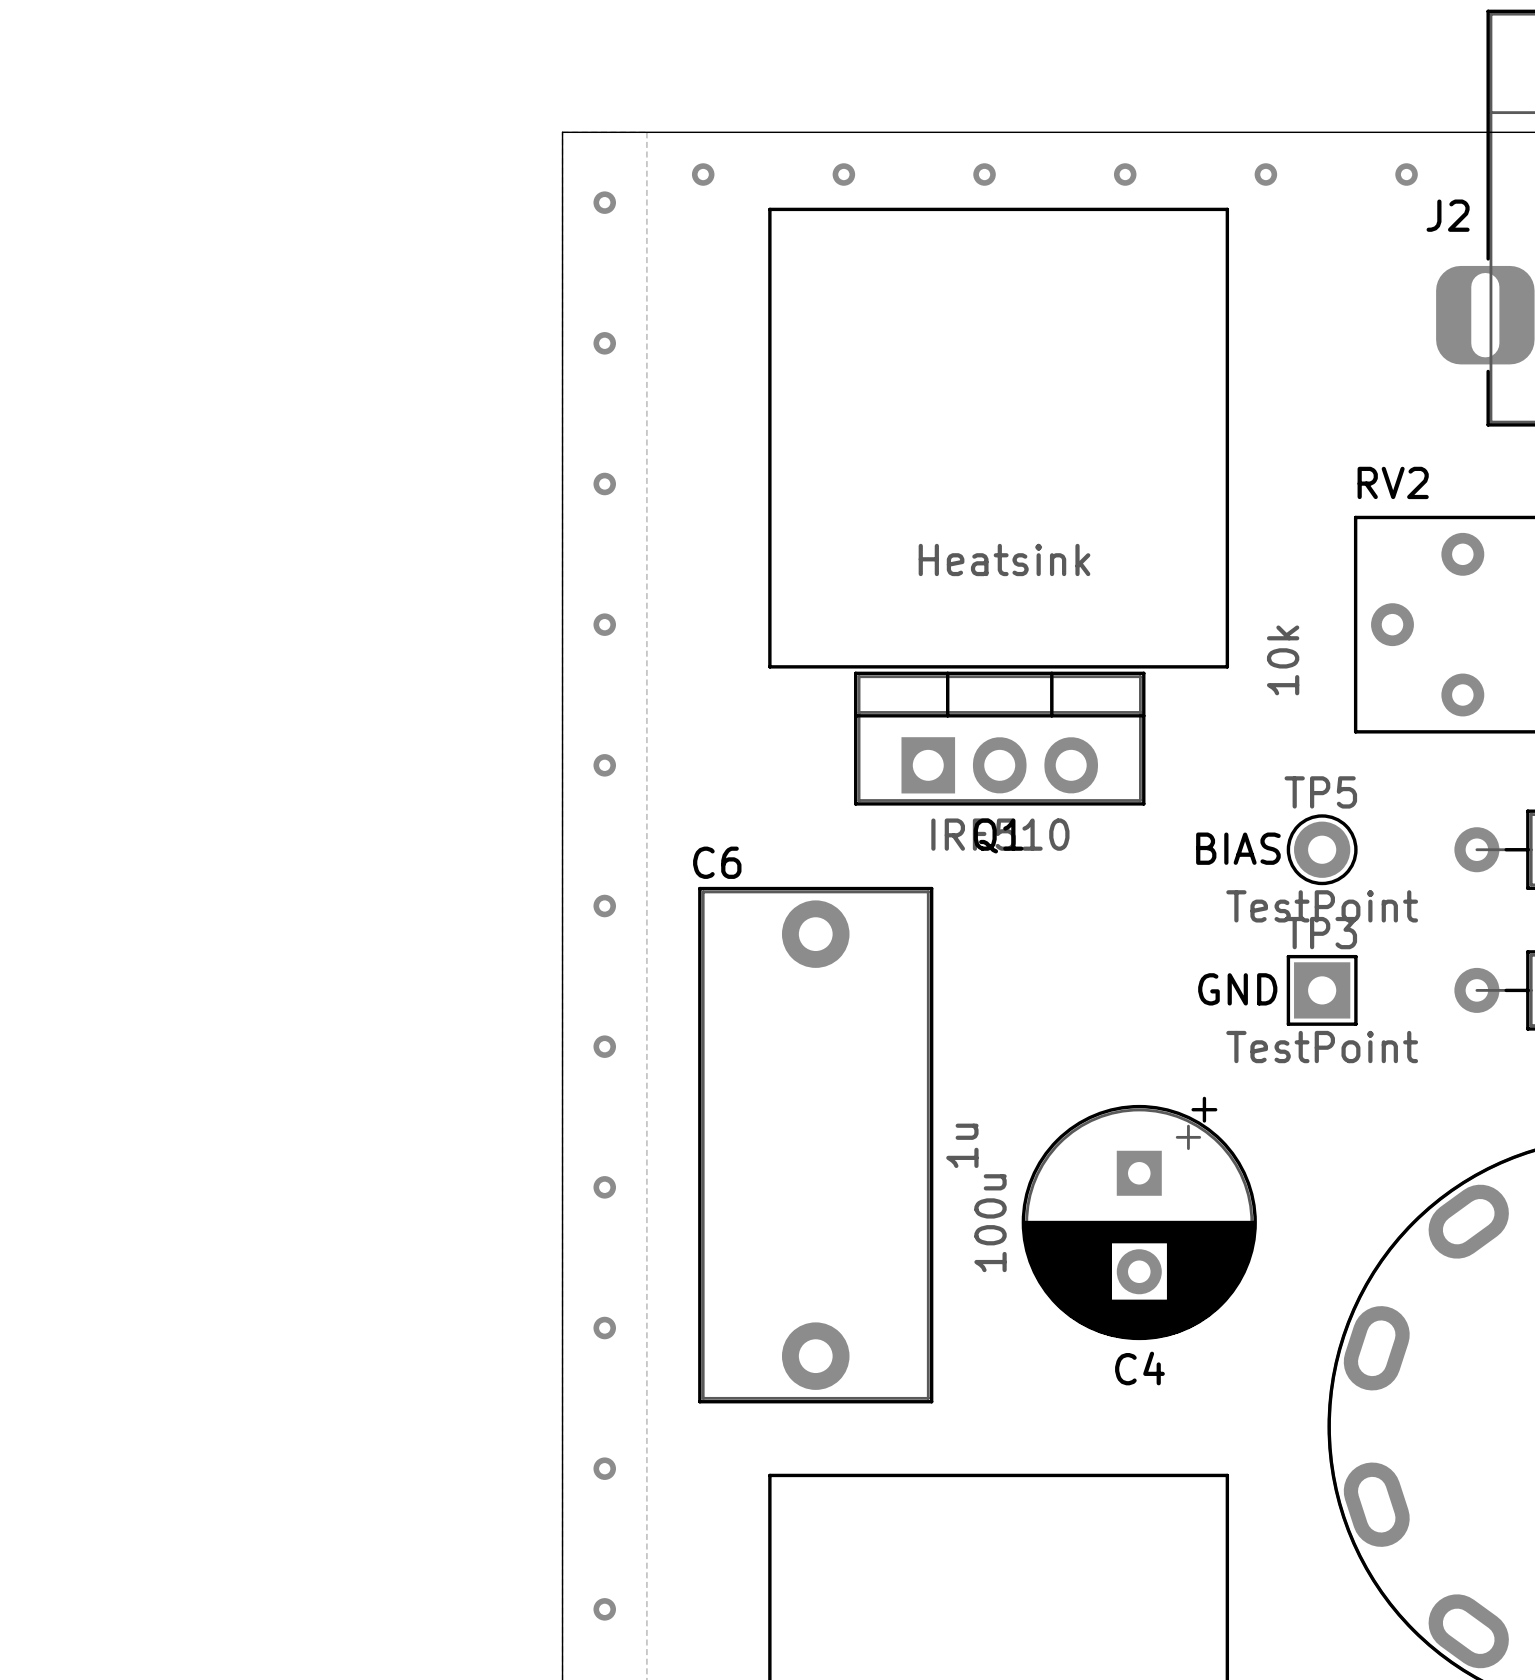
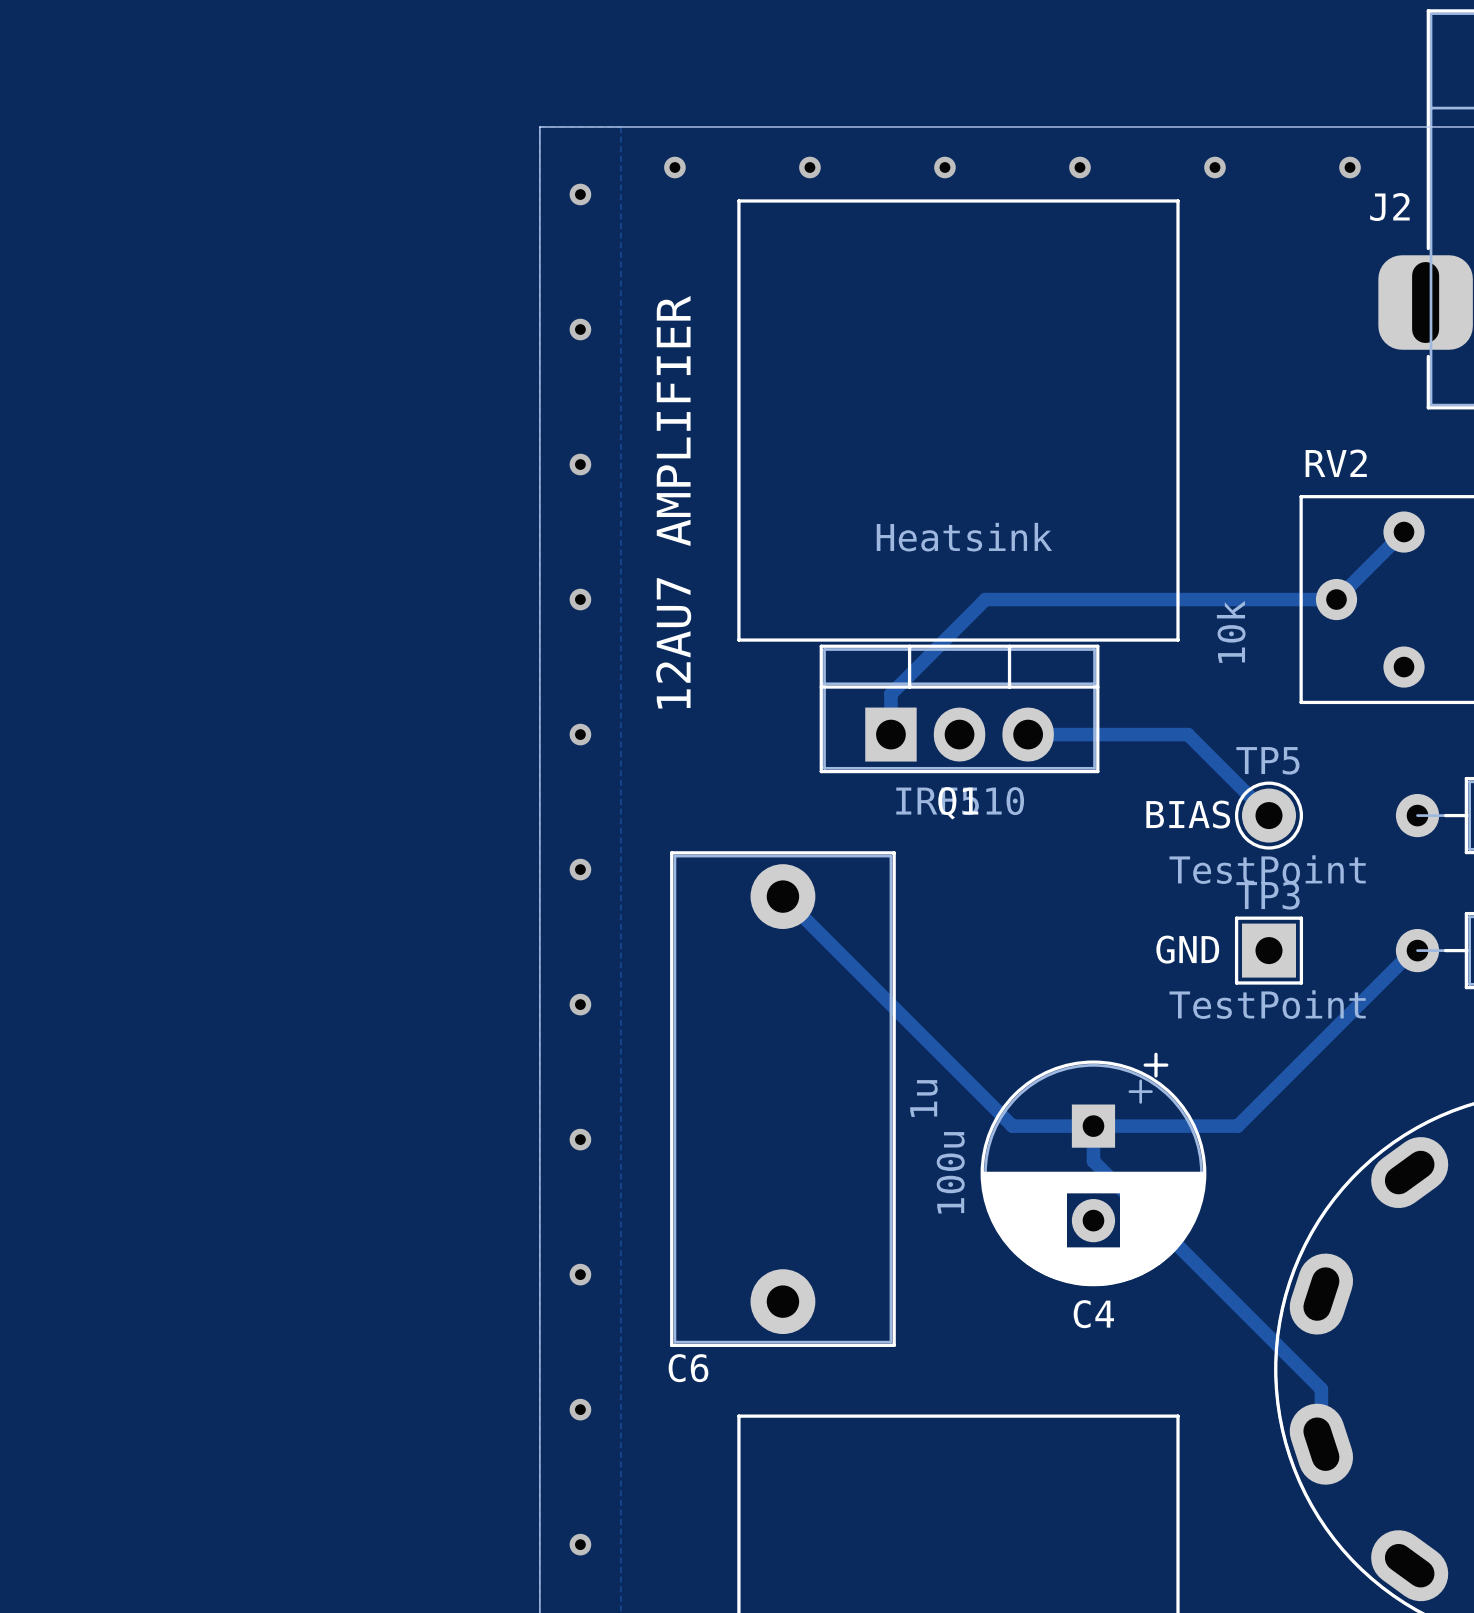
text: none -> 12AU7 AMPLIFIER (673, 502)
track: none -> (1404, 532) (1336, 599) (985, 599) (890, 694) (890, 734)
track: none -> (1028, 734) (1187, 734) (1269, 815)
C6 name position: C6 (717, 862) -> C6 (688, 1368)
track: none -> (782, 896) (1012, 1126) (1237, 1126) (1413, 950)
track: none -> (1093, 1126) (1093, 1161) (1321, 1389) (1321, 1444)

